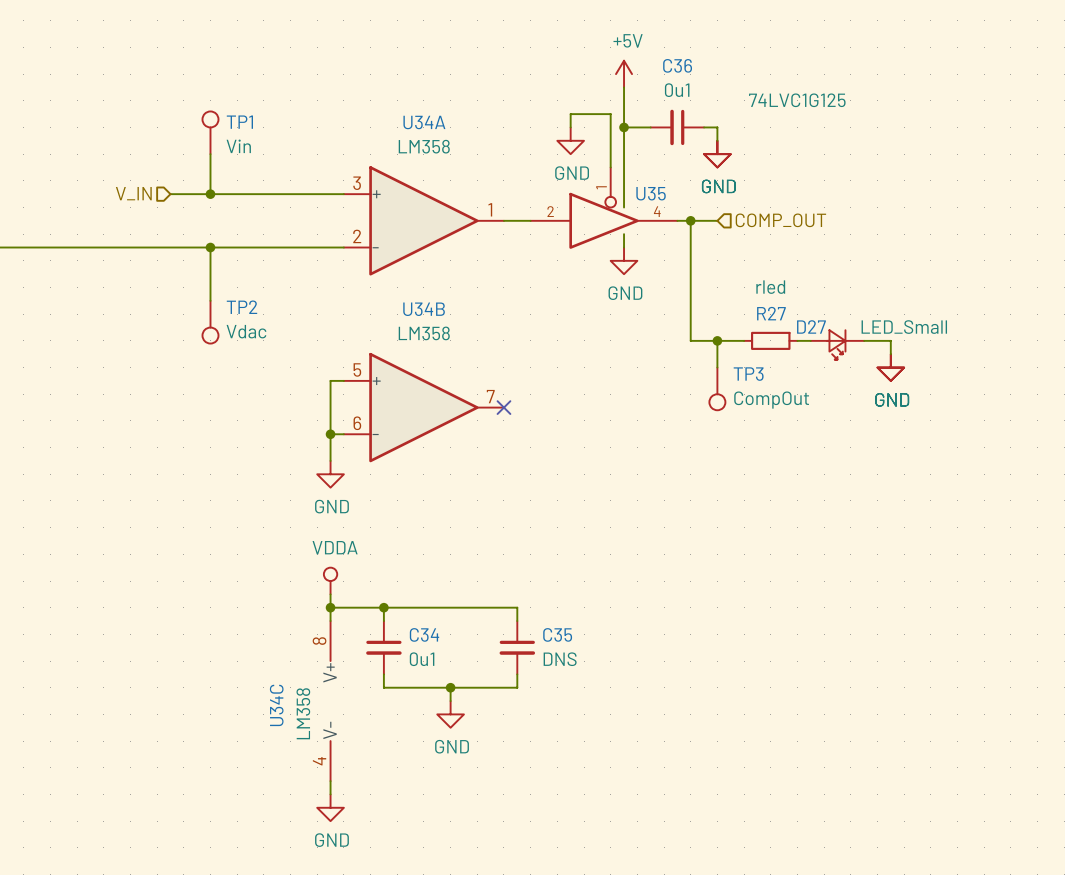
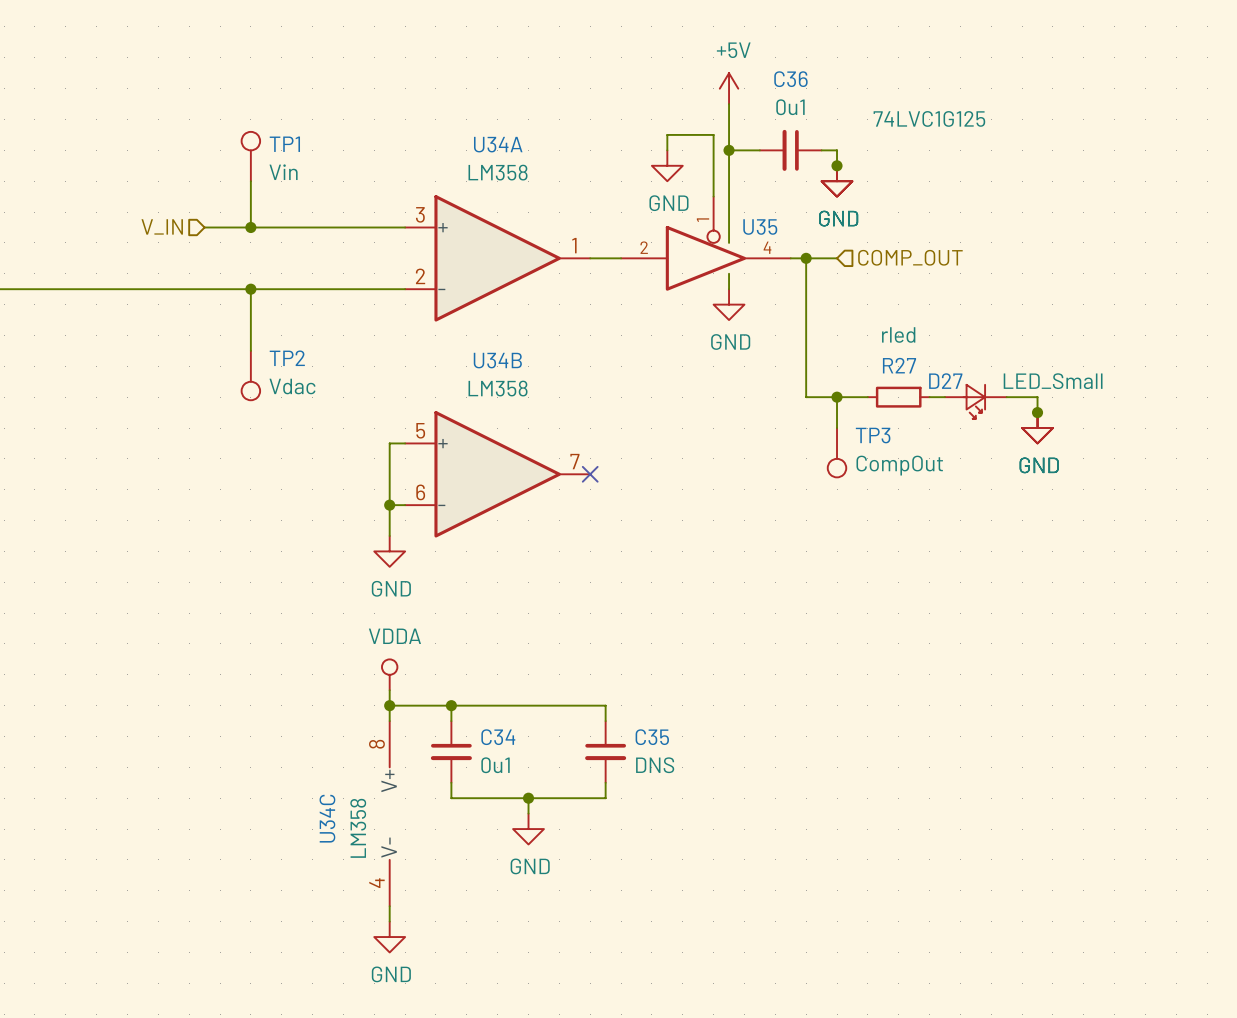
junction: none -> (837, 165)
junction: none -> (1037, 412)

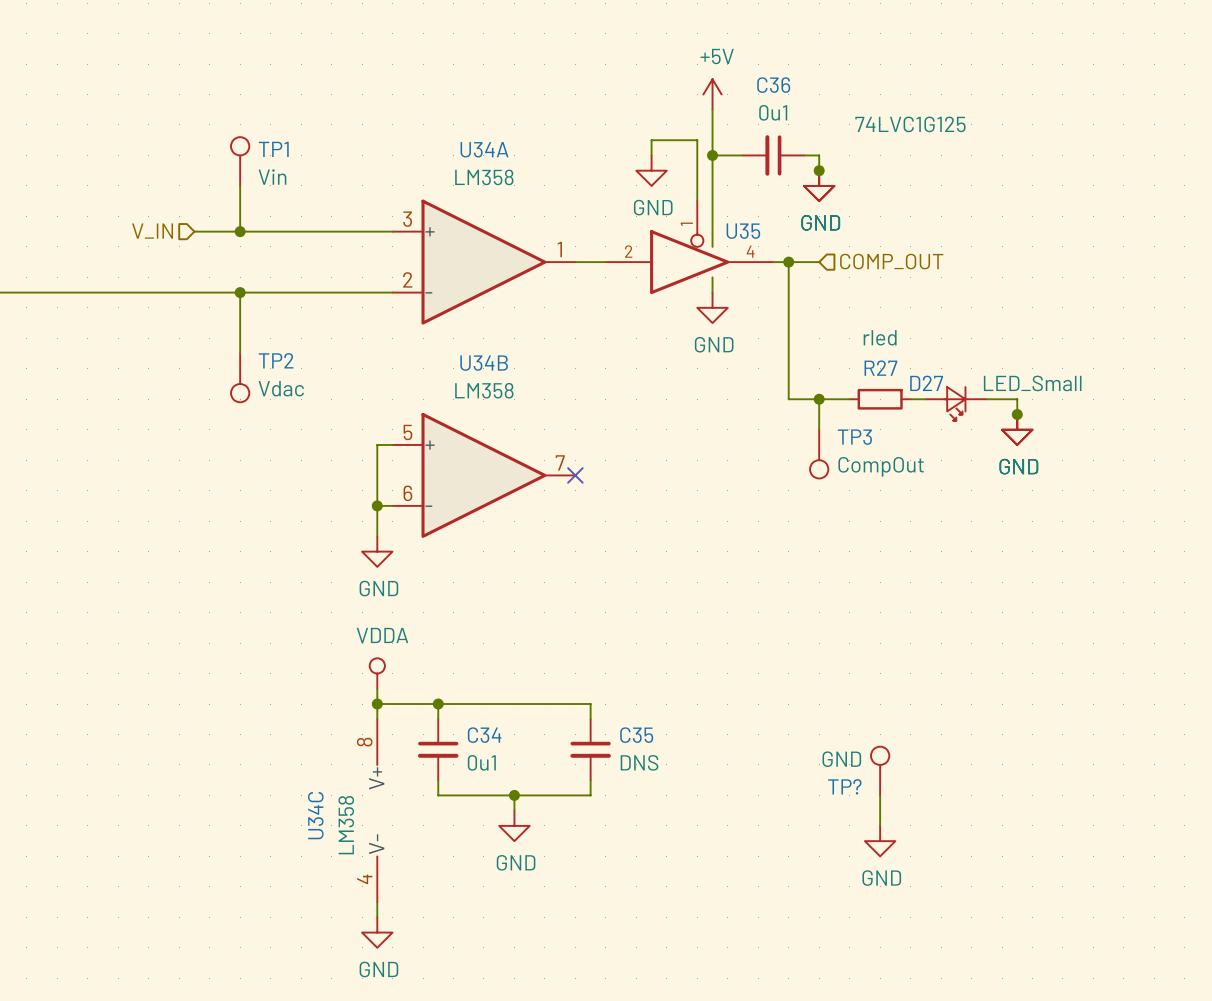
TP?: none -> GND (880, 771)
wire: none -> (880, 795) (880, 825)
power symbol: none -> GND (880, 841)

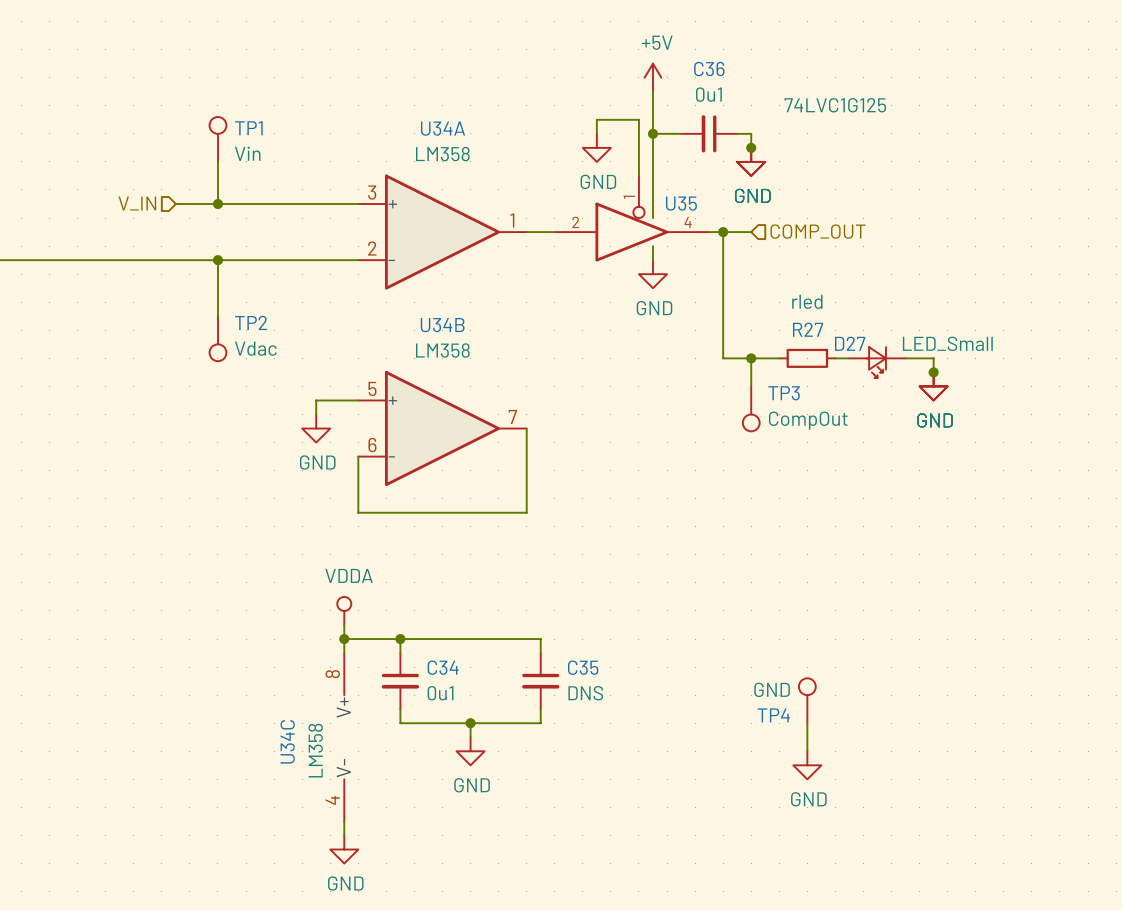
wire: (377, 444) (377, 536) -> (344, 400) (316, 400) (316, 414)
no-connect mark: (575, 475) -> none
wire: (377, 505) (392, 505) -> (526, 428) (526, 512) (358, 512) (358, 456)
junction: (377, 505) -> none
power symbol position: GND (377, 551) -> GND (316, 428)
TP? name: TP? (844, 786) -> TP4 (773, 715)

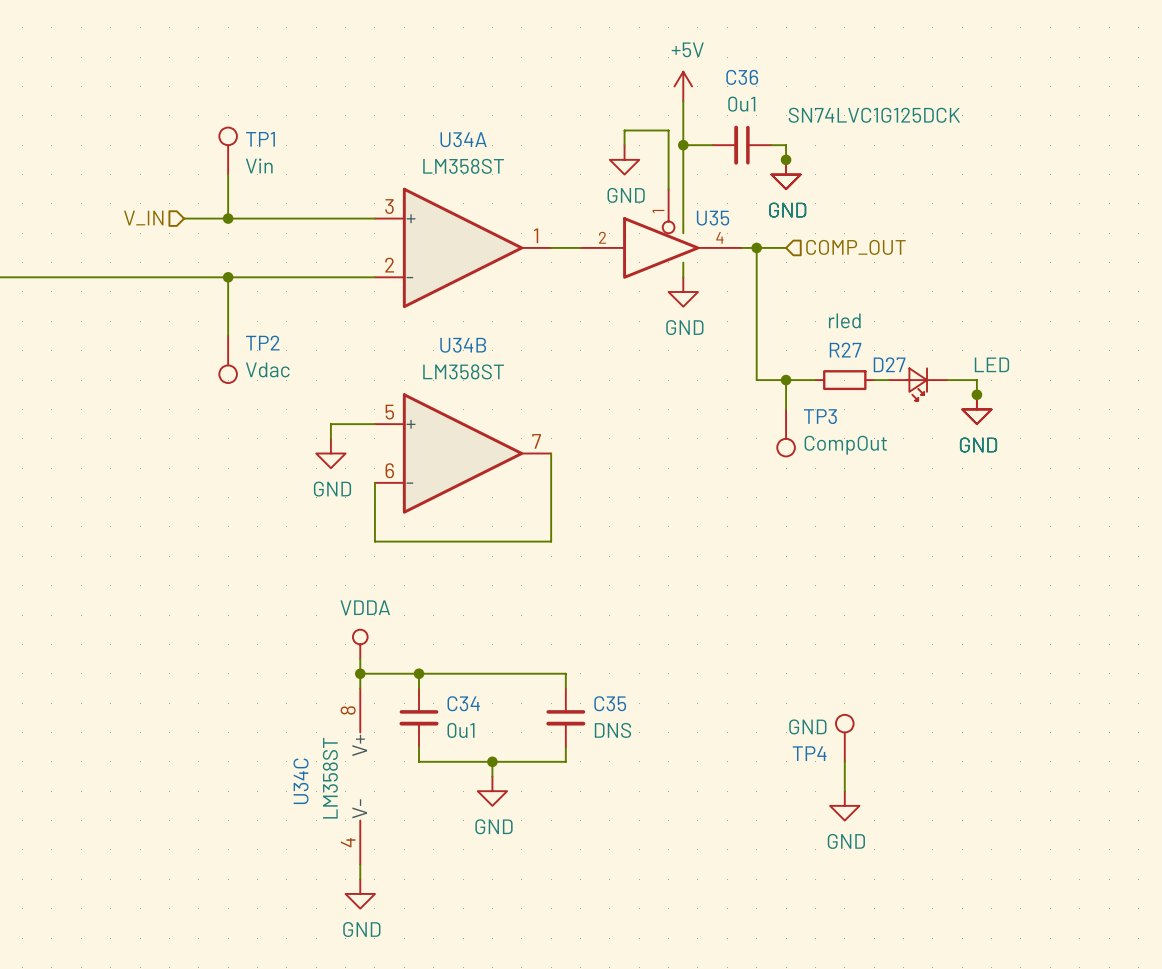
U35 value: 74LVC1G125 (835, 105) -> SN74LVC1G125DCK (874, 115)
U34A value: LM358 (442, 154) -> LM358ST (463, 166)
D27 value: LED_Small (947, 343) -> LED (991, 364)
U34B value: LM358 (442, 350) -> LM358ST (463, 371)
U34C value: LM358 (315, 750) -> LM358ST (330, 778)

